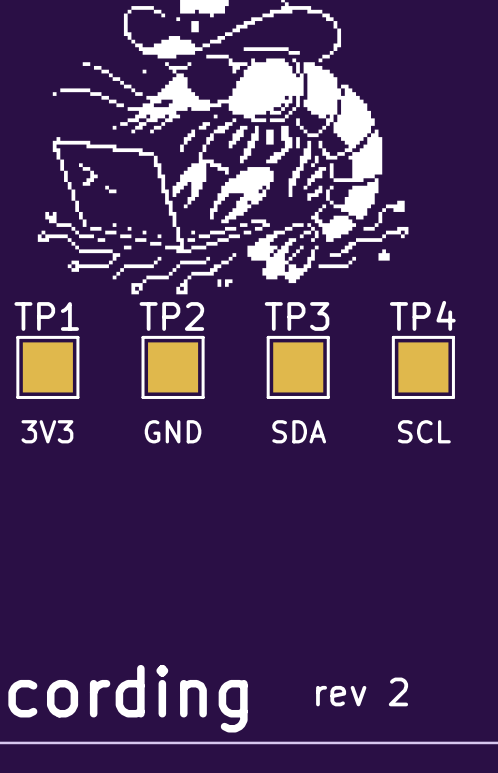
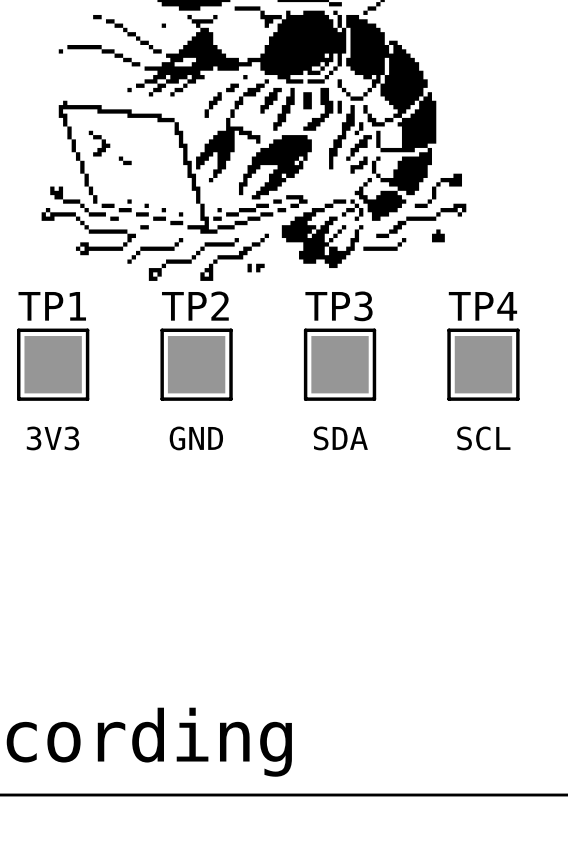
text: rev 2 (362, 691) -> none

